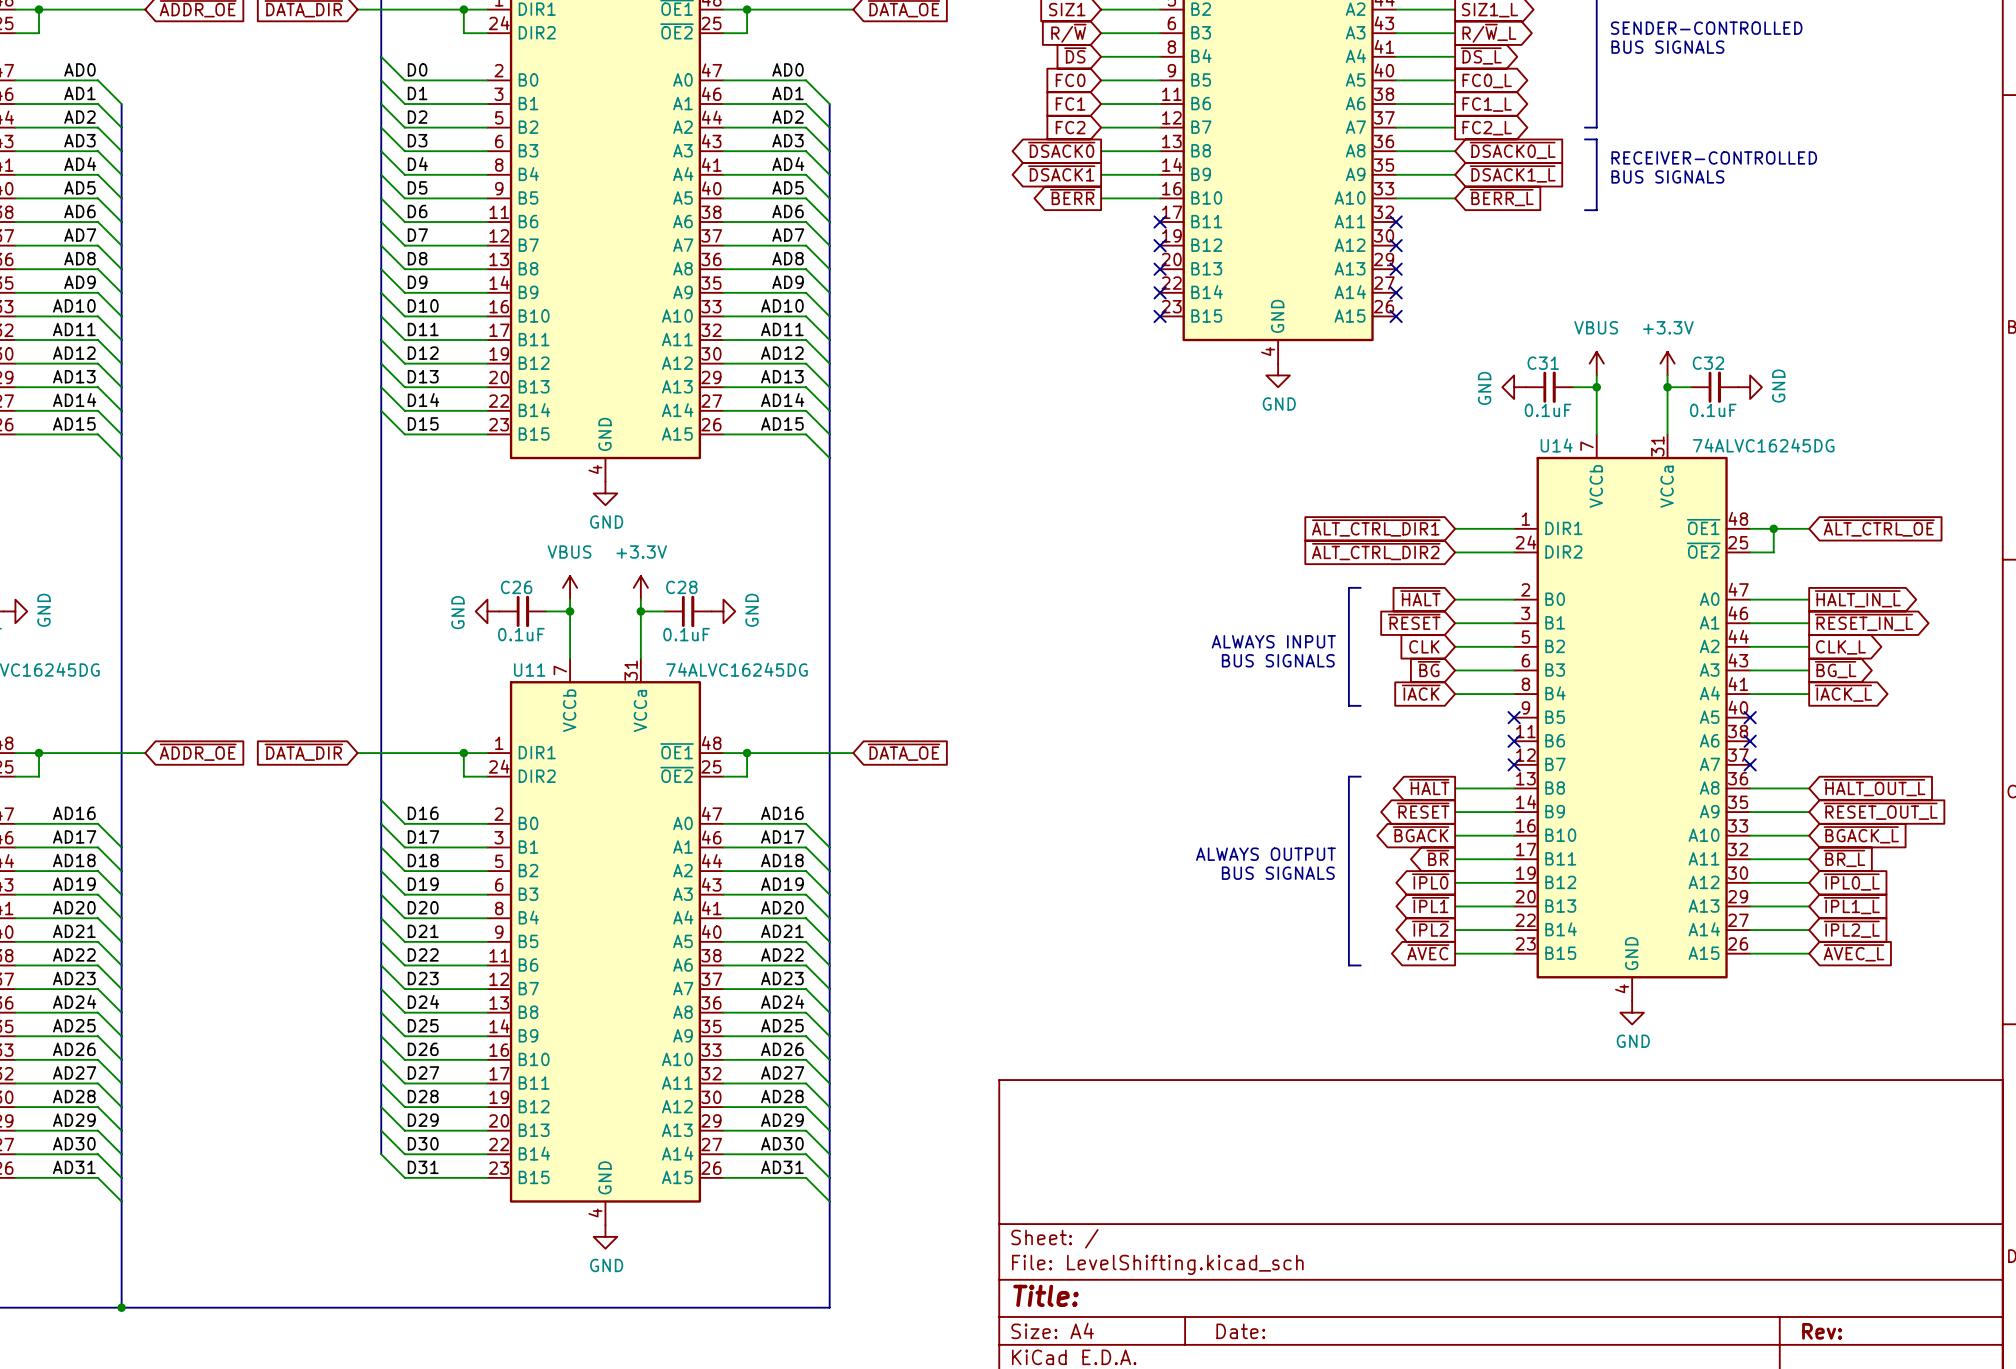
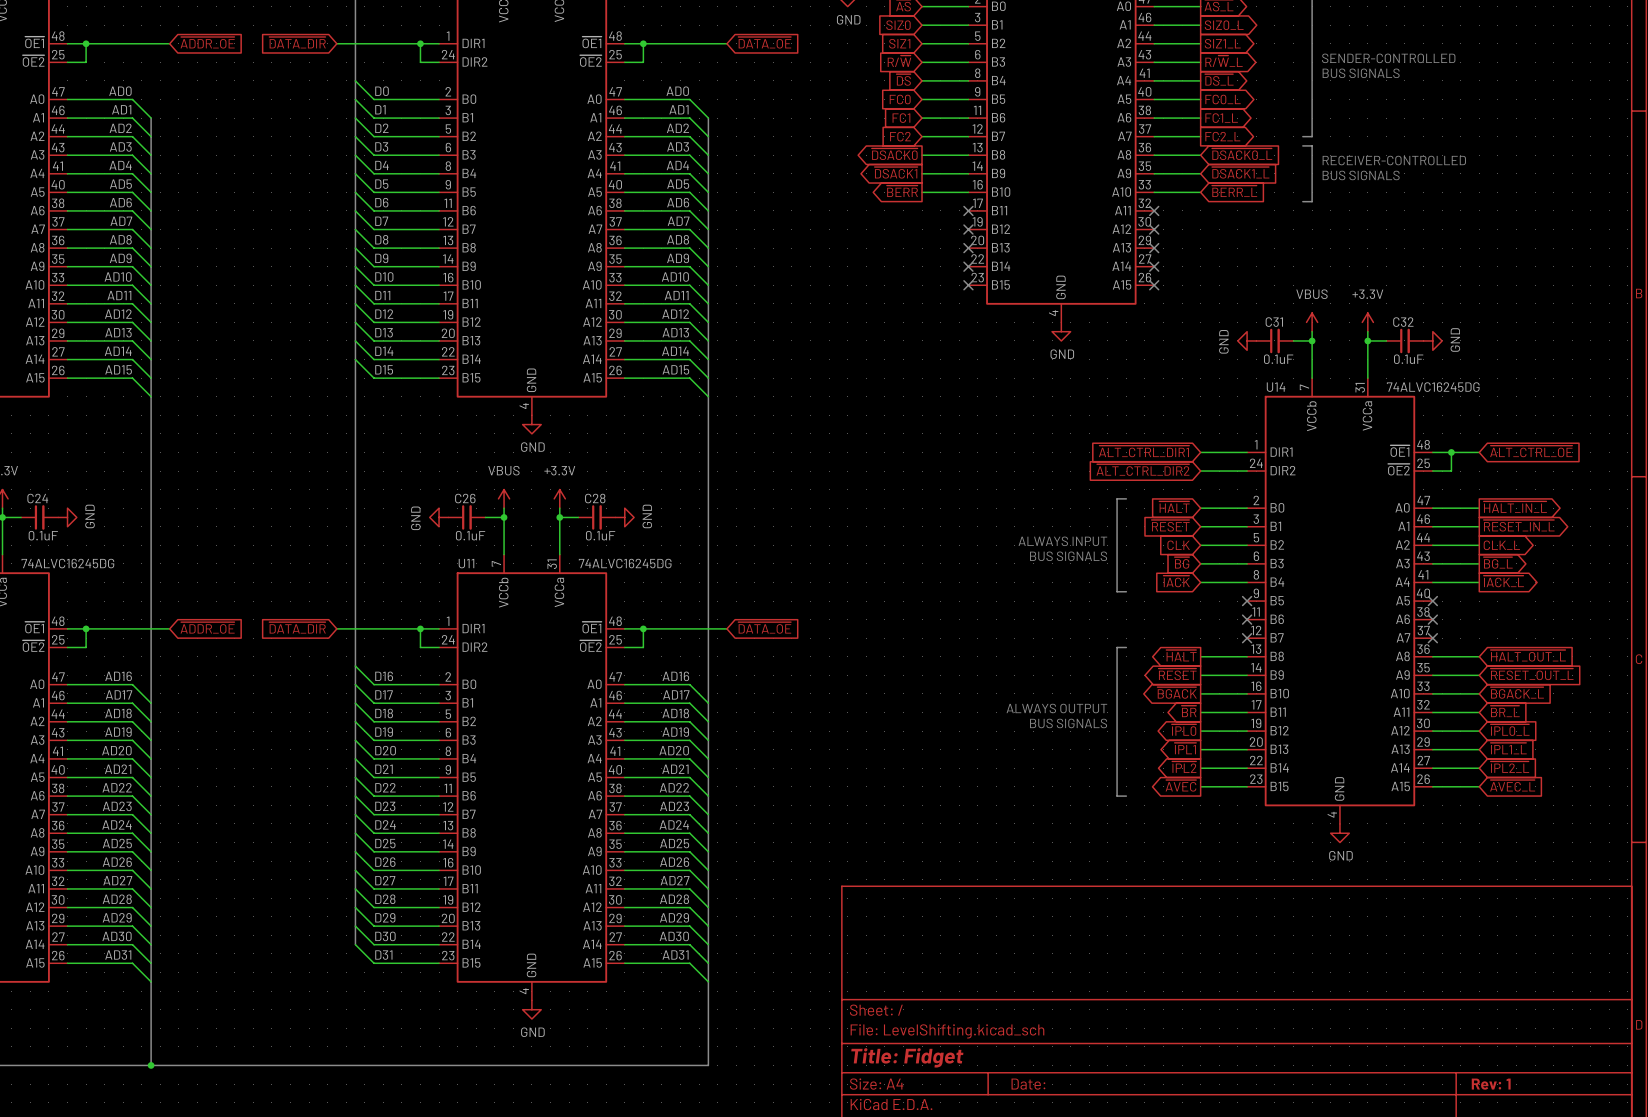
title block: Title: (1046, 1295) -> Title: Fidget (907, 1057)
title block: Rev: (1822, 1331) -> Rev: 1 (1491, 1084)

